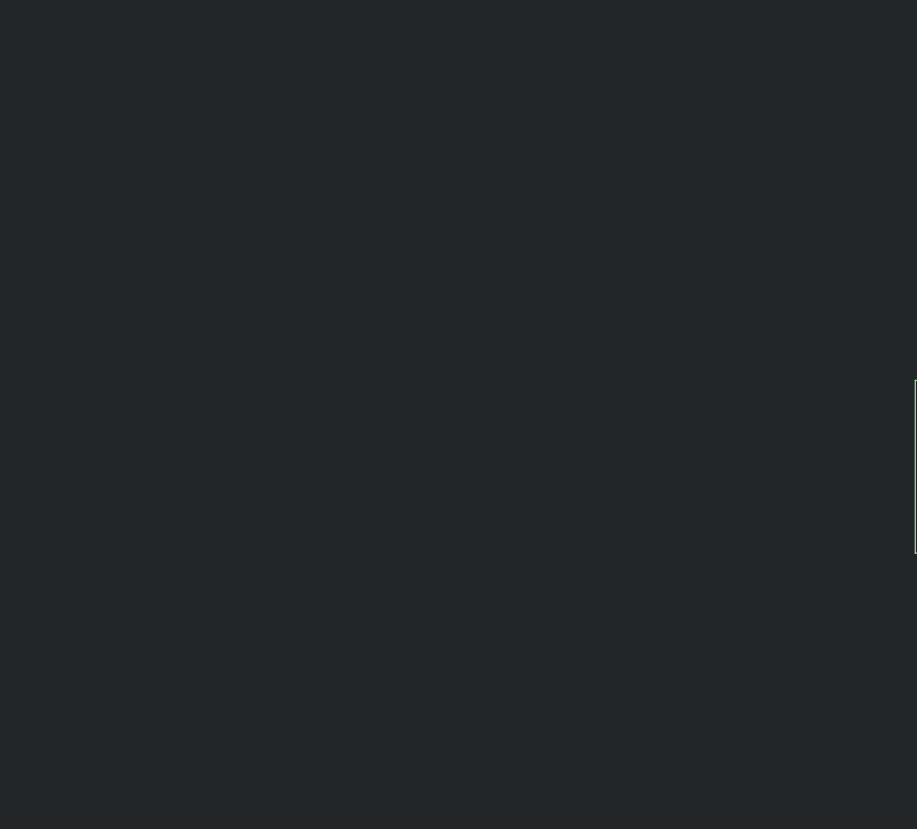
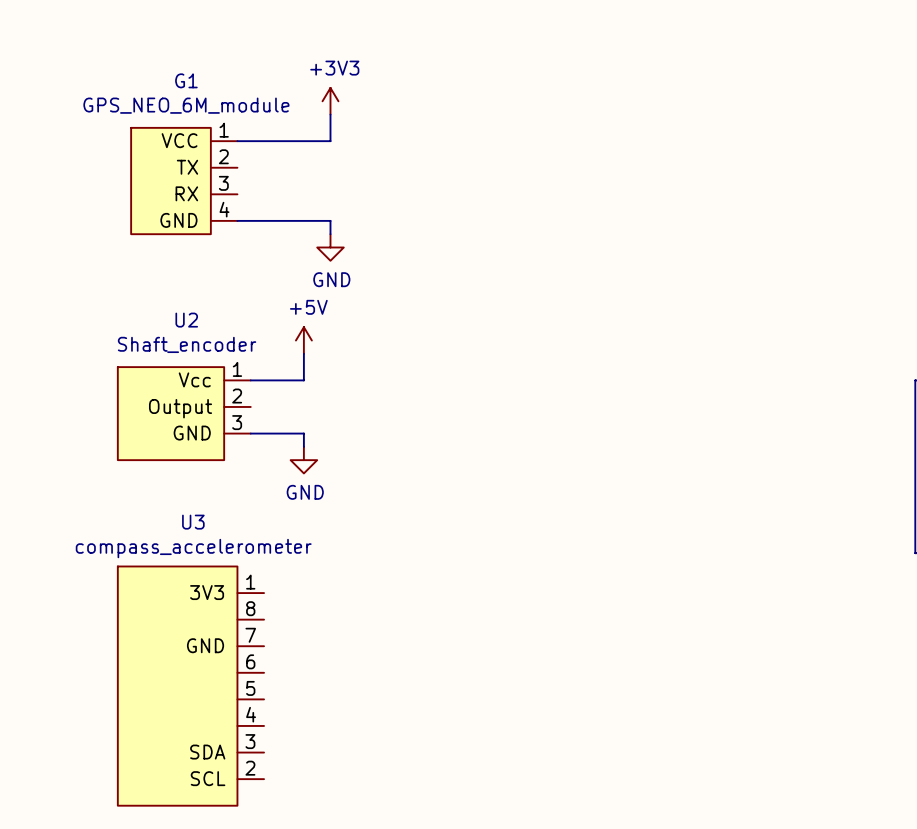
power symbol: none -> +3V3 (330, 101)
wire: none -> (330, 114) (330, 141) (237, 141)
G1: none -> GPS_NEO_6M_module (184, 181)
wire: none -> (237, 220) (330, 220) (330, 234)
power symbol: none -> GND (330, 247)
power symbol: none -> +5V (303, 340)
wire: none -> (303, 353) (303, 380) (250, 380)
U2: none -> Shaft_encoder (184, 413)
wire: none -> (250, 433) (303, 433) (303, 446)
power symbol: none -> GND (303, 460)
U3: none -> compass_accelerometer (190, 686)

